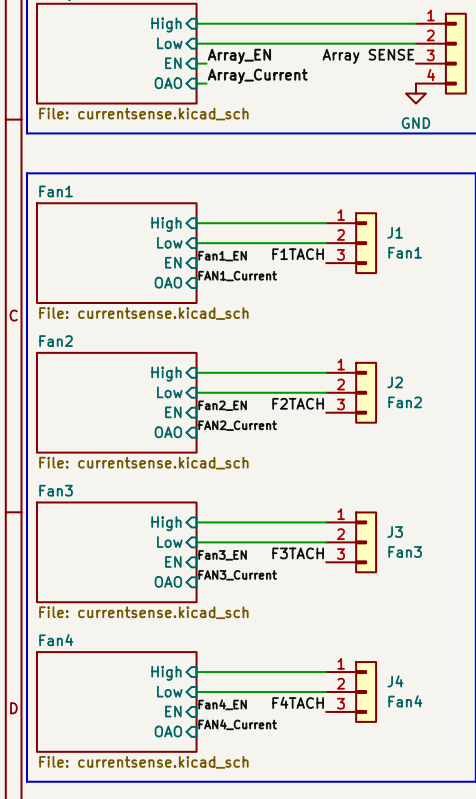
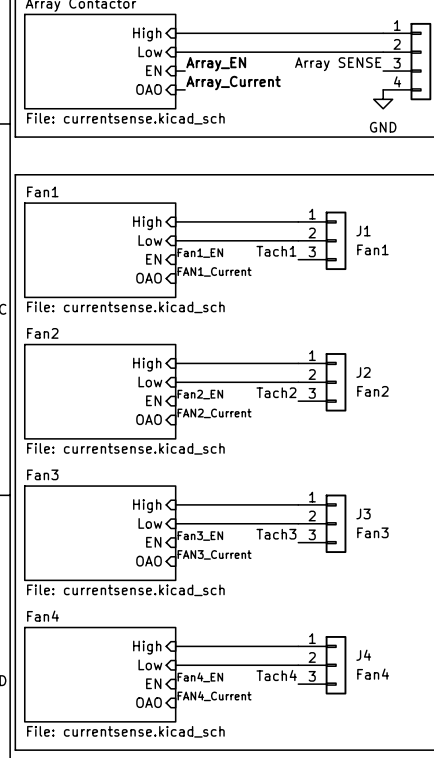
label: F1TACH (298, 254) -> Tach1 (276, 251)
label: F2TACH (298, 403) -> Tach2 (276, 392)
label: F3TACH (298, 553) -> Tach3 (276, 534)
label: F4TACH (298, 702) -> Tach4 (276, 675)

